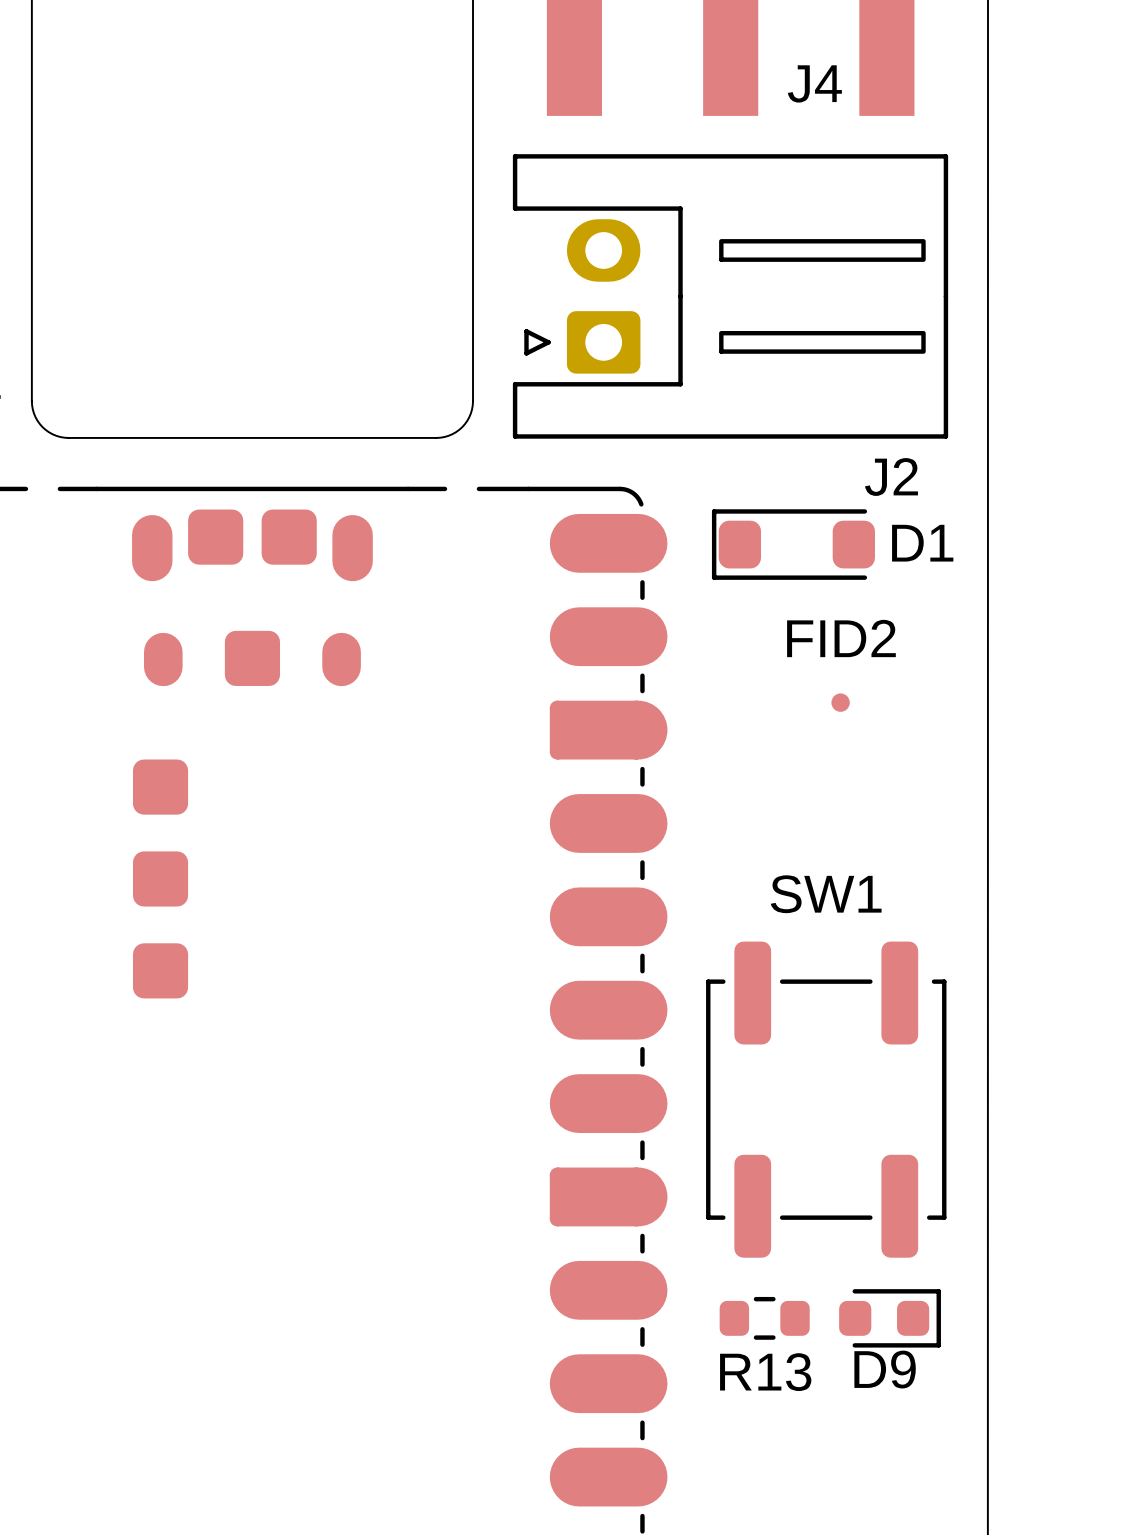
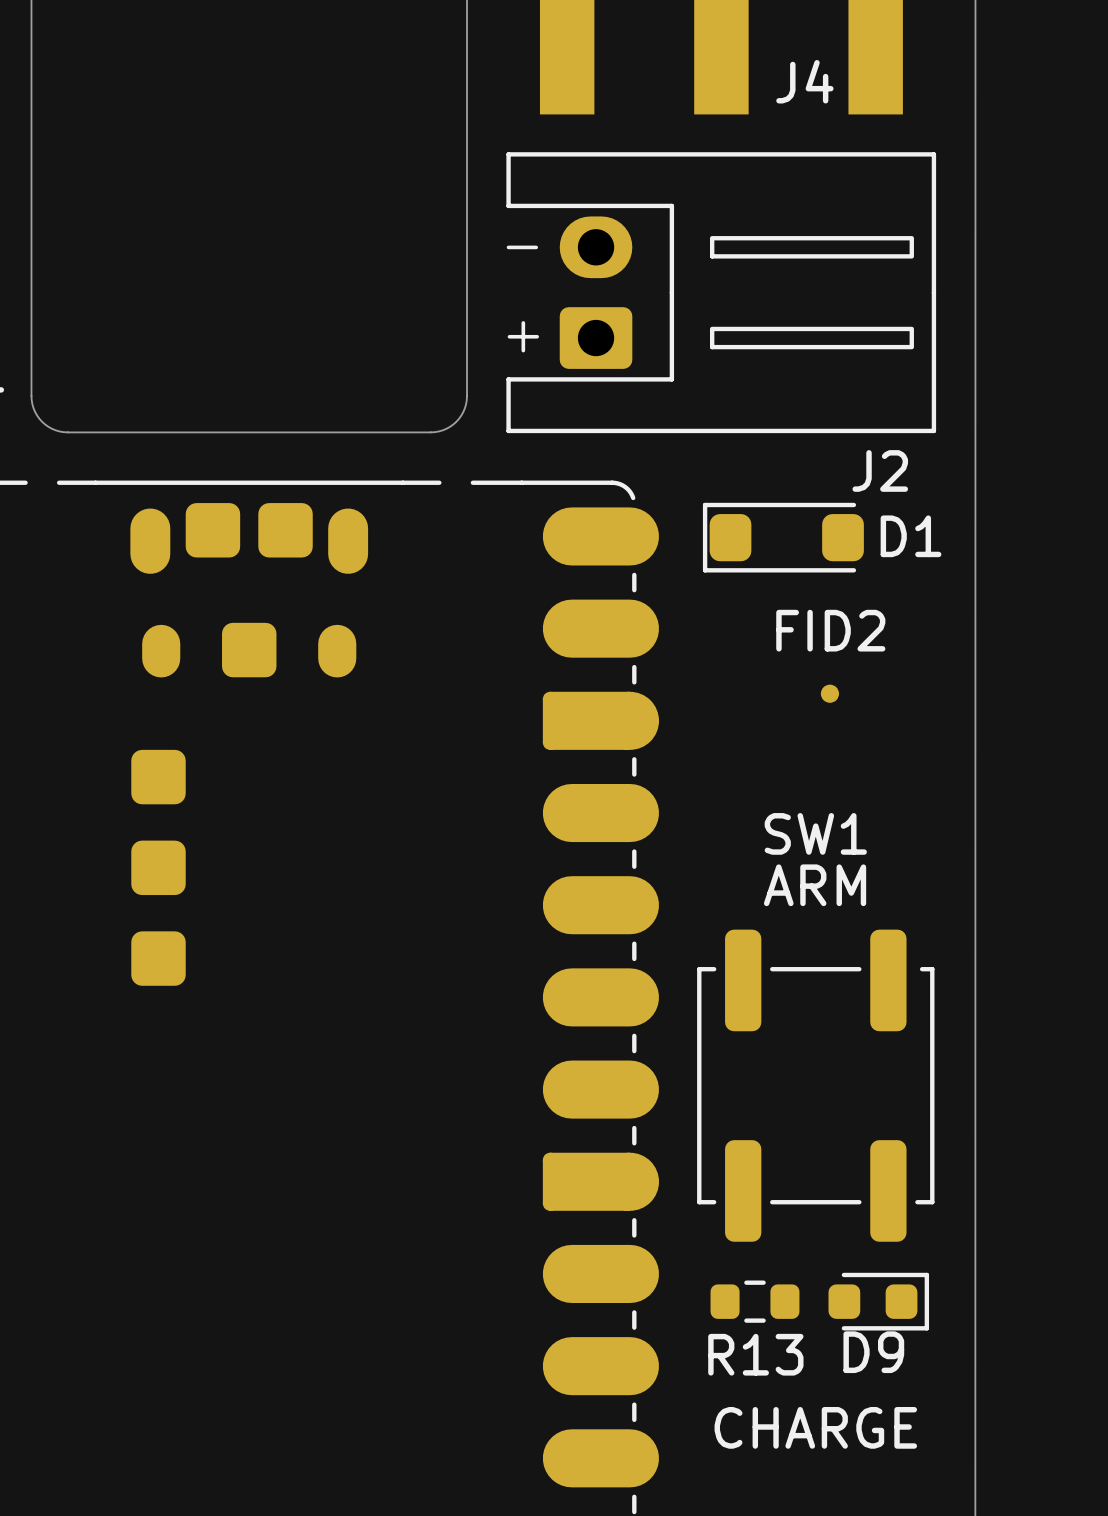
J2 footprint: [512, 154, 949, 439] -> [506, 152, 937, 434]
SW1 name position: SW1 (826, 894) -> SW1 (815, 833)
text: none -> ARM (815, 885)
text: none -> CHARGE (815, 1427)

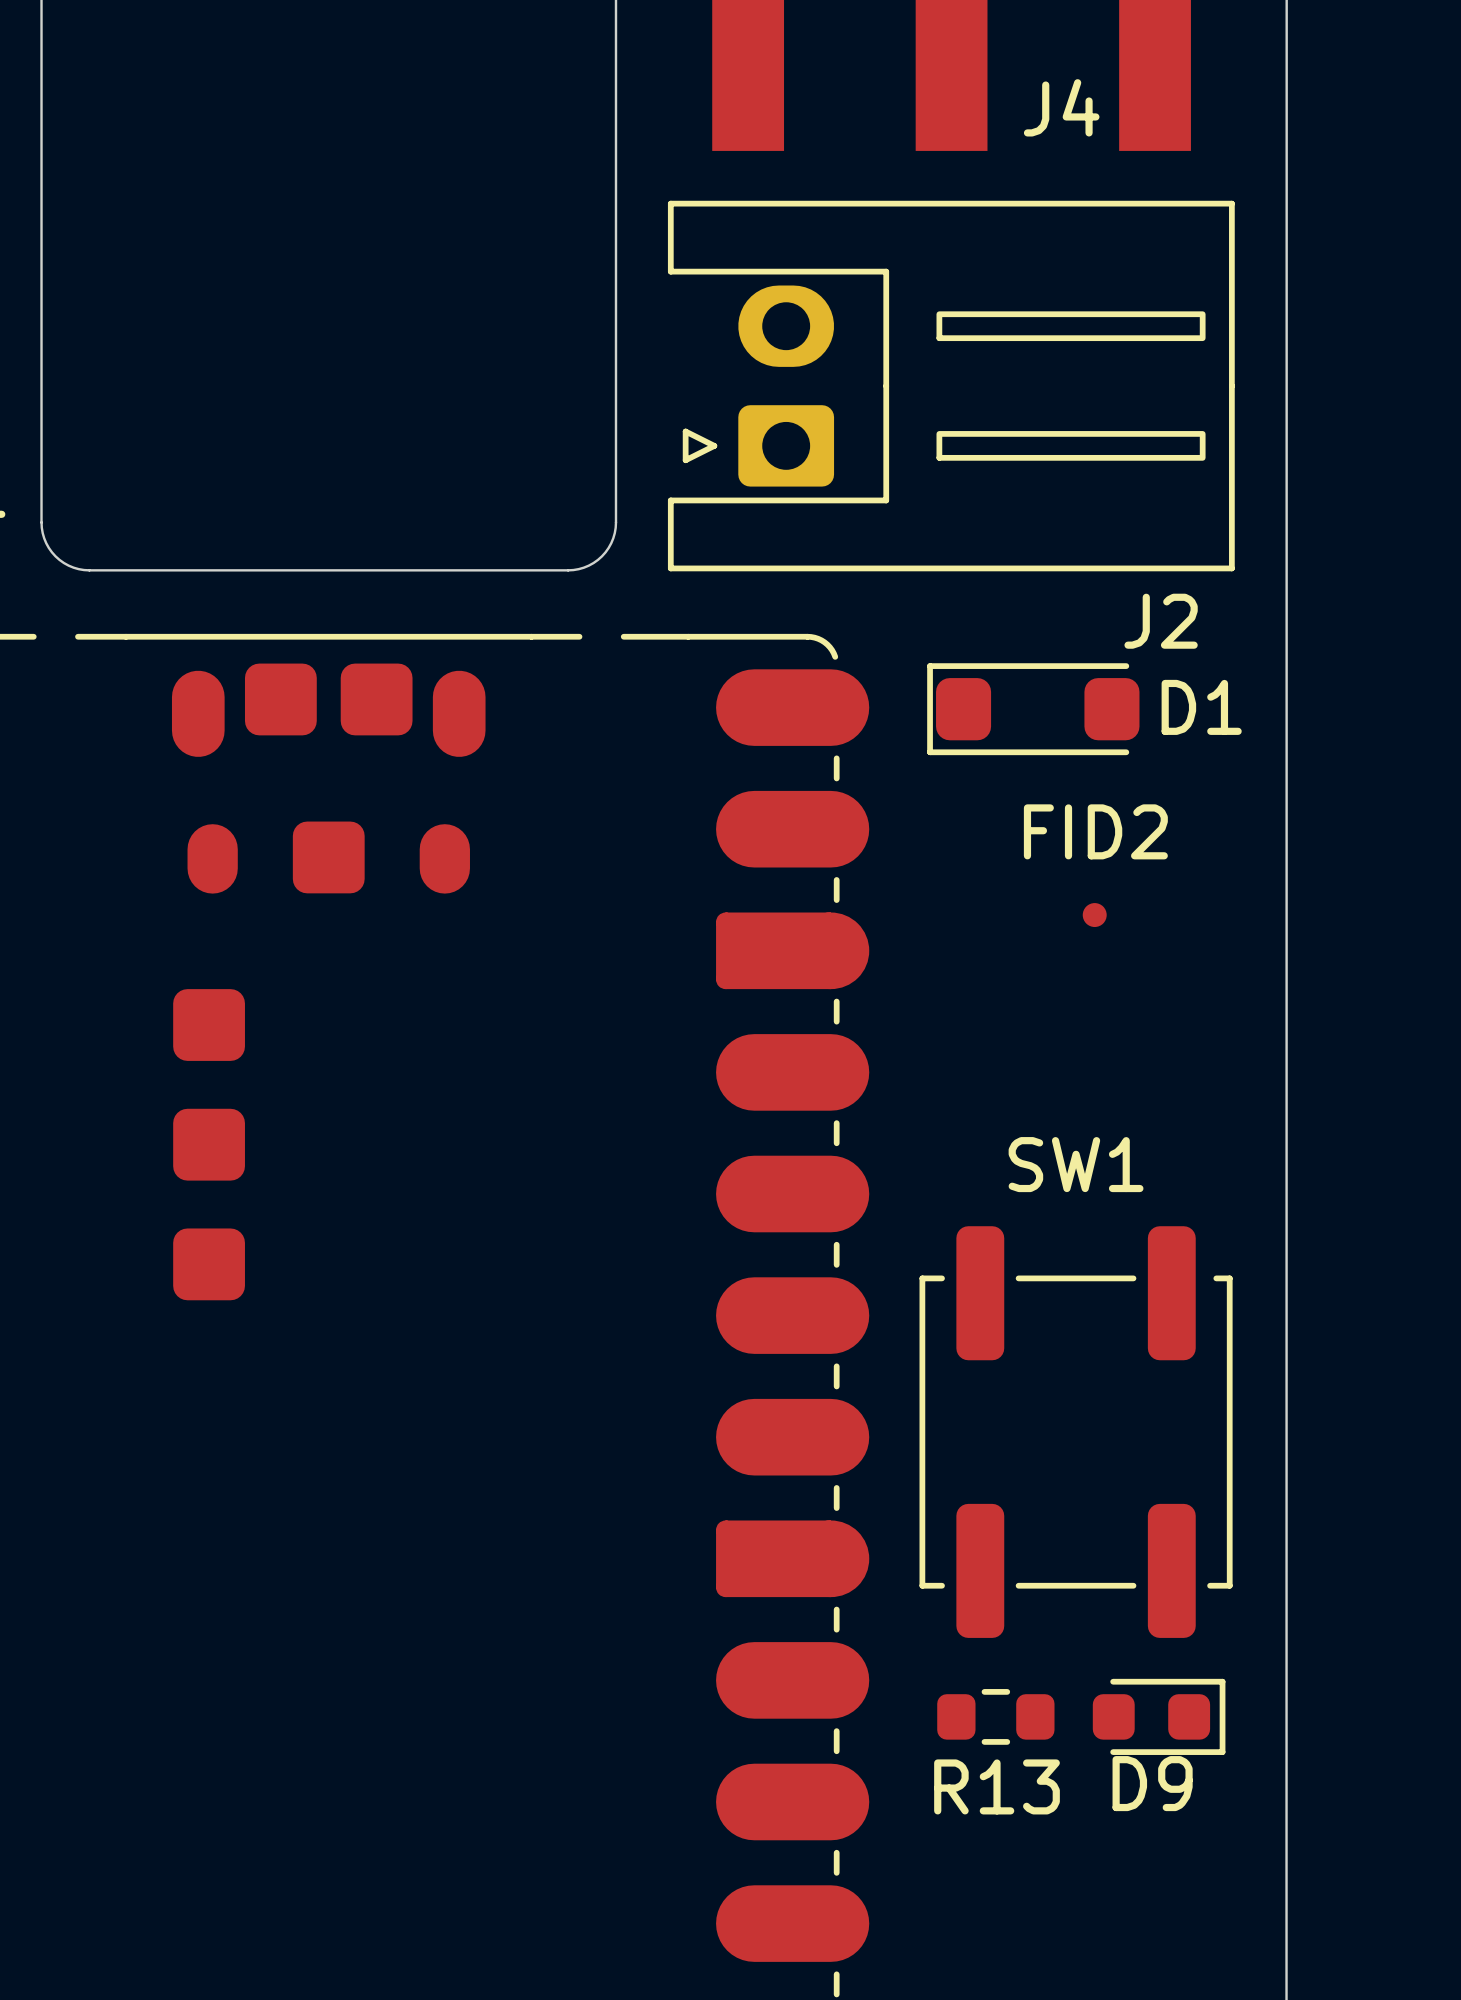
J2 footprint: [506, 152, 937, 434] -> [667, 200, 1235, 572]
SW1 name position: SW1 (815, 833) -> SW1 (1076, 1164)
text: ARM (815, 885) -> none
text: CHARGE (815, 1427) -> none

